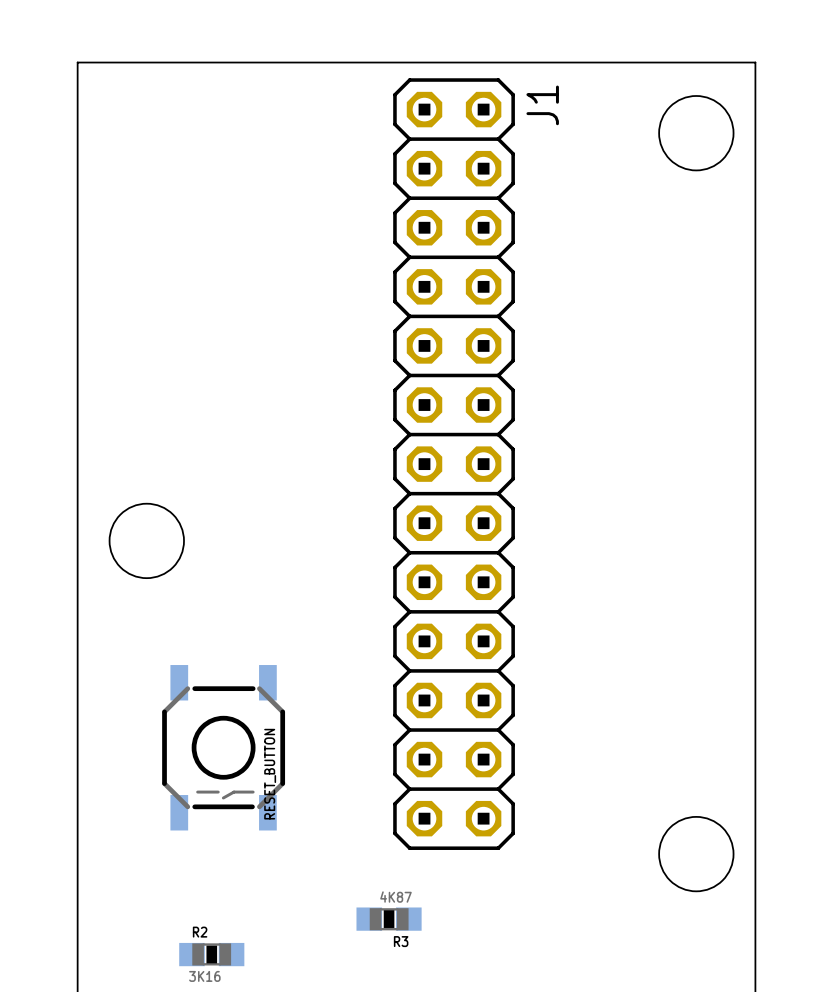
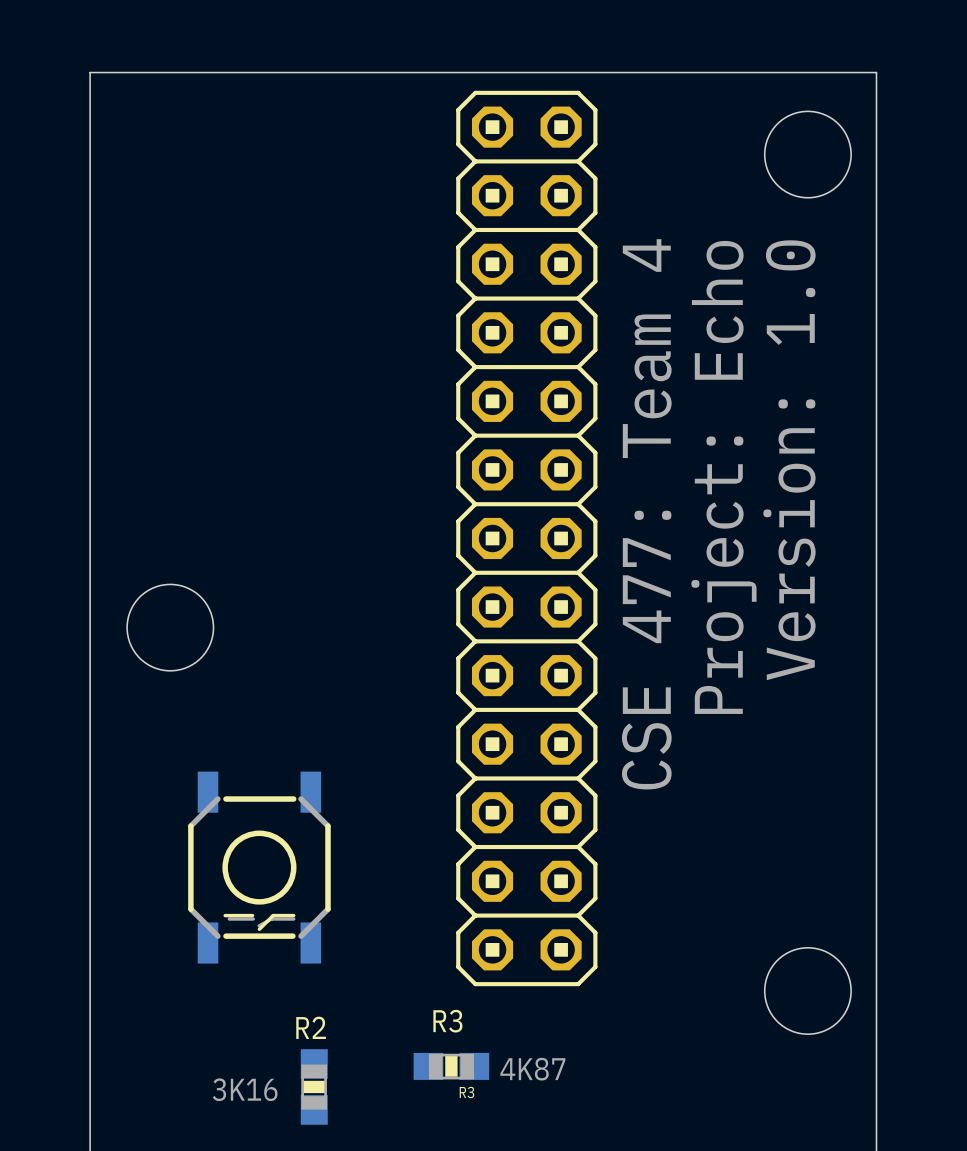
J1 name: J1 (542, 105) -> none
text: none -> Version: 1.0 (789, 460)
text: none -> Project: Echo (723, 477)
text: none -> CSE 477: Team 4 (646, 514)
RESET_BUTTON name: RESET_BUTTON (270, 774) -> none
line: none -> (252, 915) (225, 915)
line: none -> (293, 915) (273, 915) (259, 929)
text: none -> R3 (447, 1021)
text: none -> R2 (311, 1027)
R3 value: 4K87 (395, 897) -> none
text: none -> 4K87 (532, 1069)
part: none -> (314, 1086)
text: none -> 3K16 (245, 1089)
R2: 3K16 (211, 954) -> none

